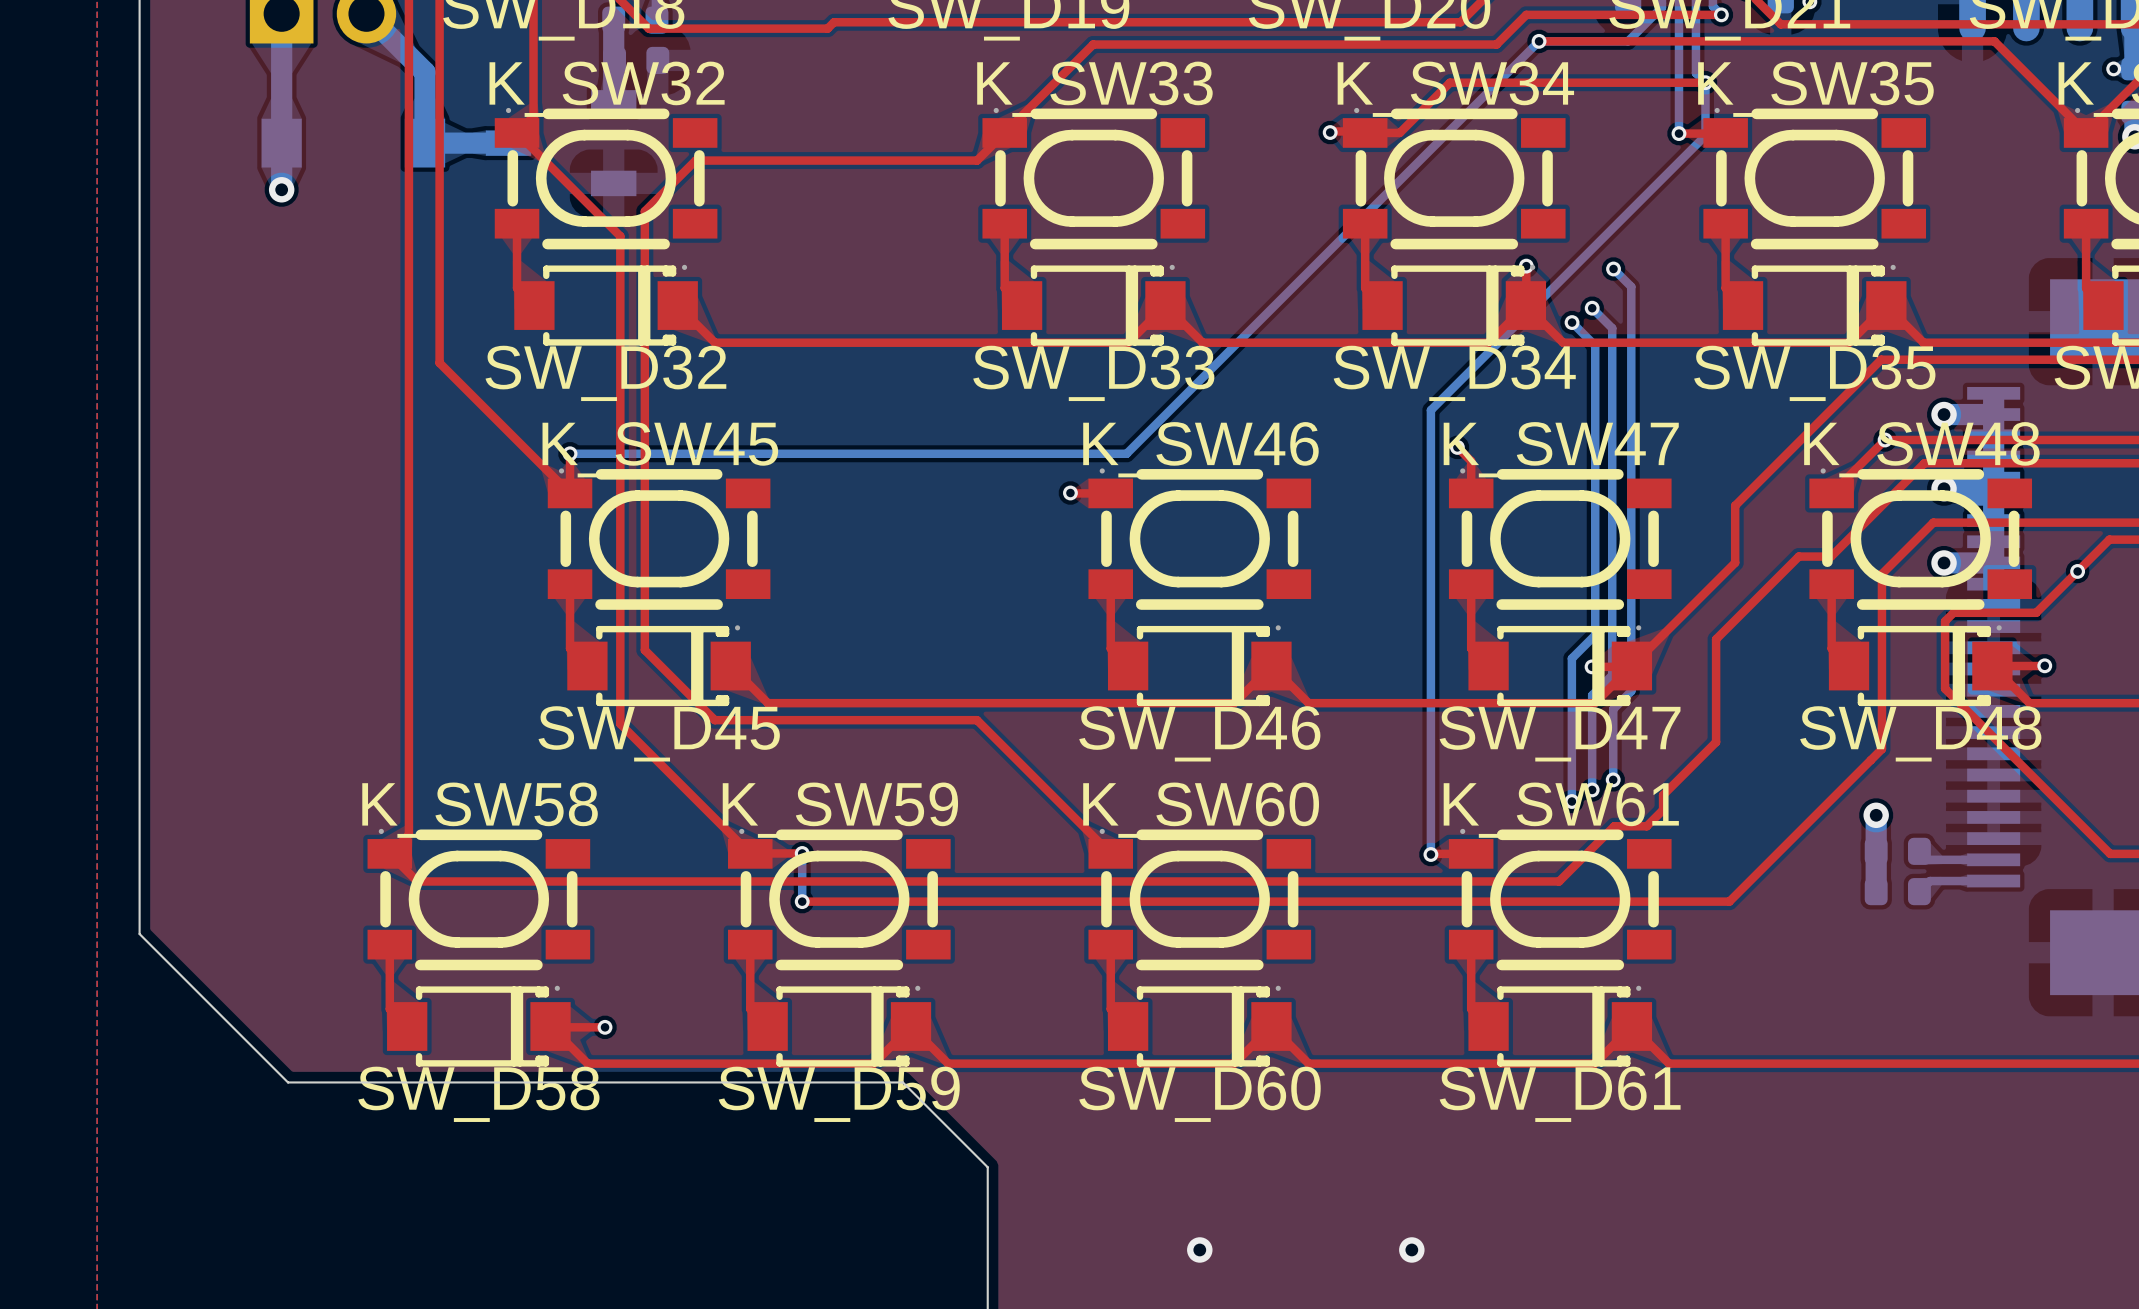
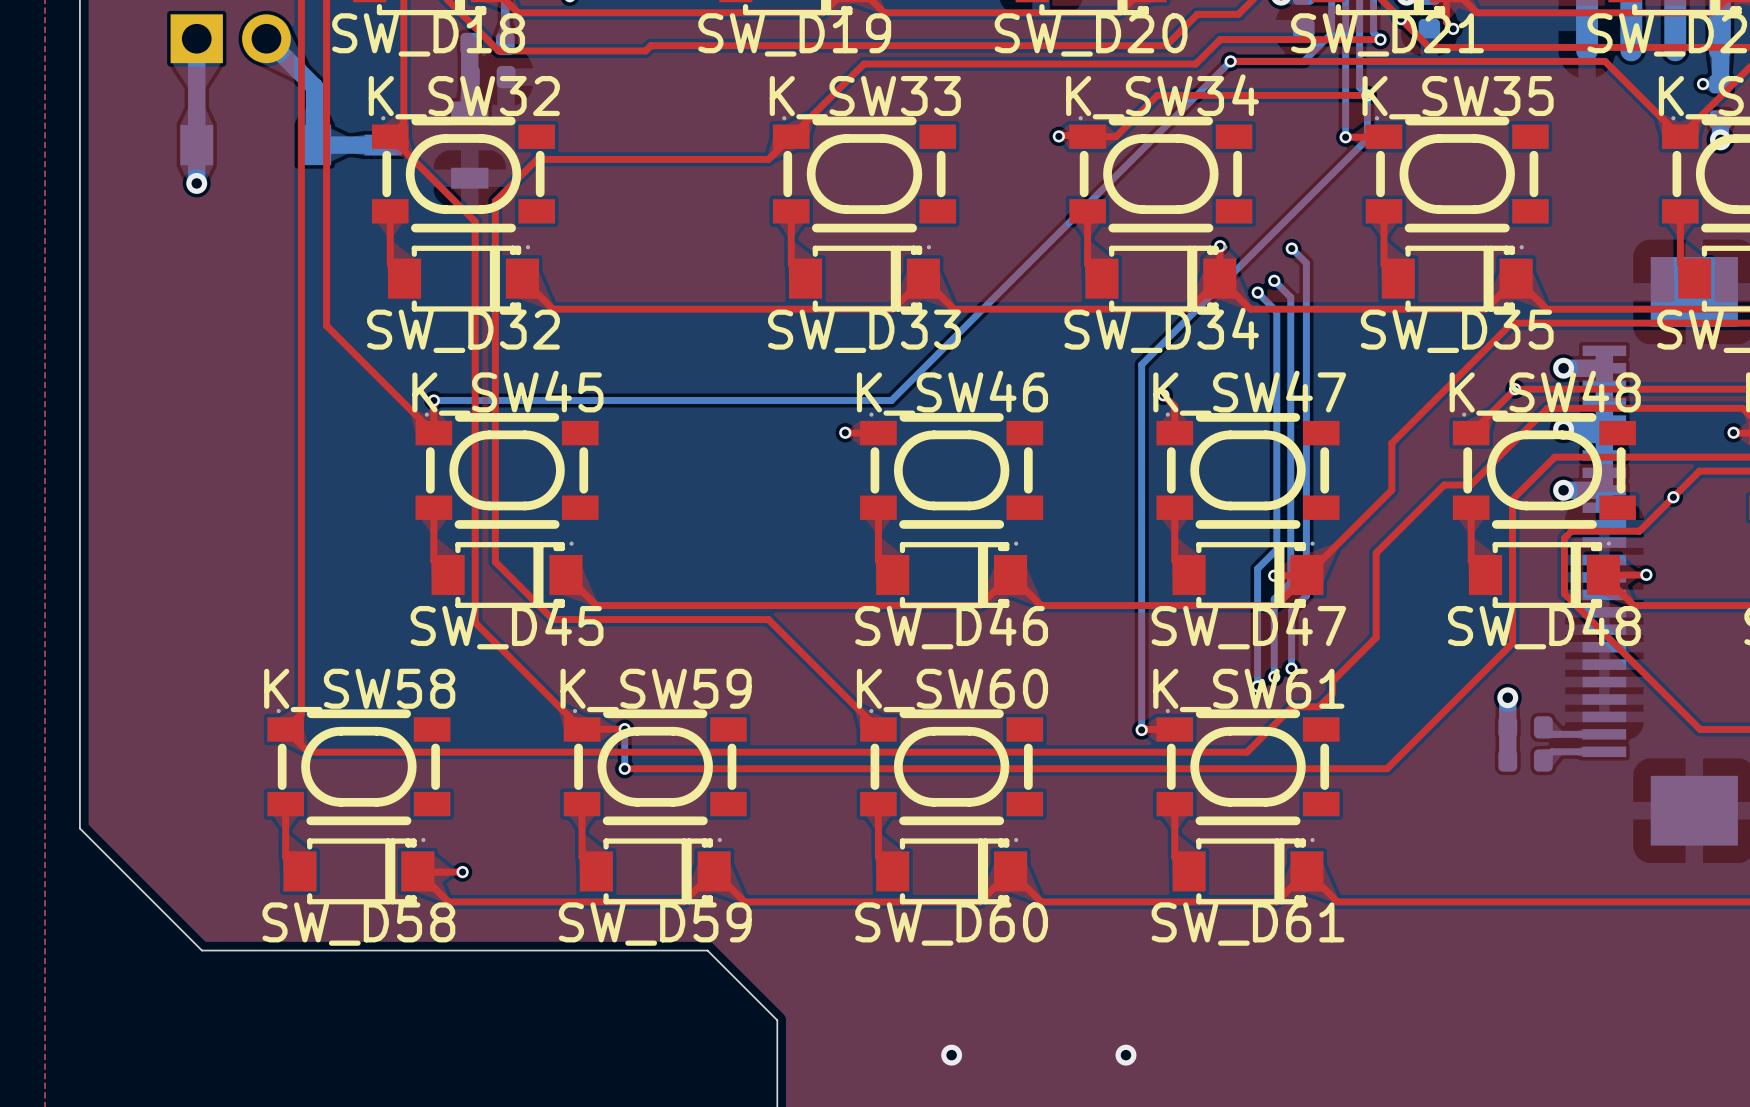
board edge: (139, 934) (288, 1082) (902, 1082) (987, 1167) (987, 1207) -> (79, 795) (79, 828) (201, 950) (707, 950) (777, 1020)

